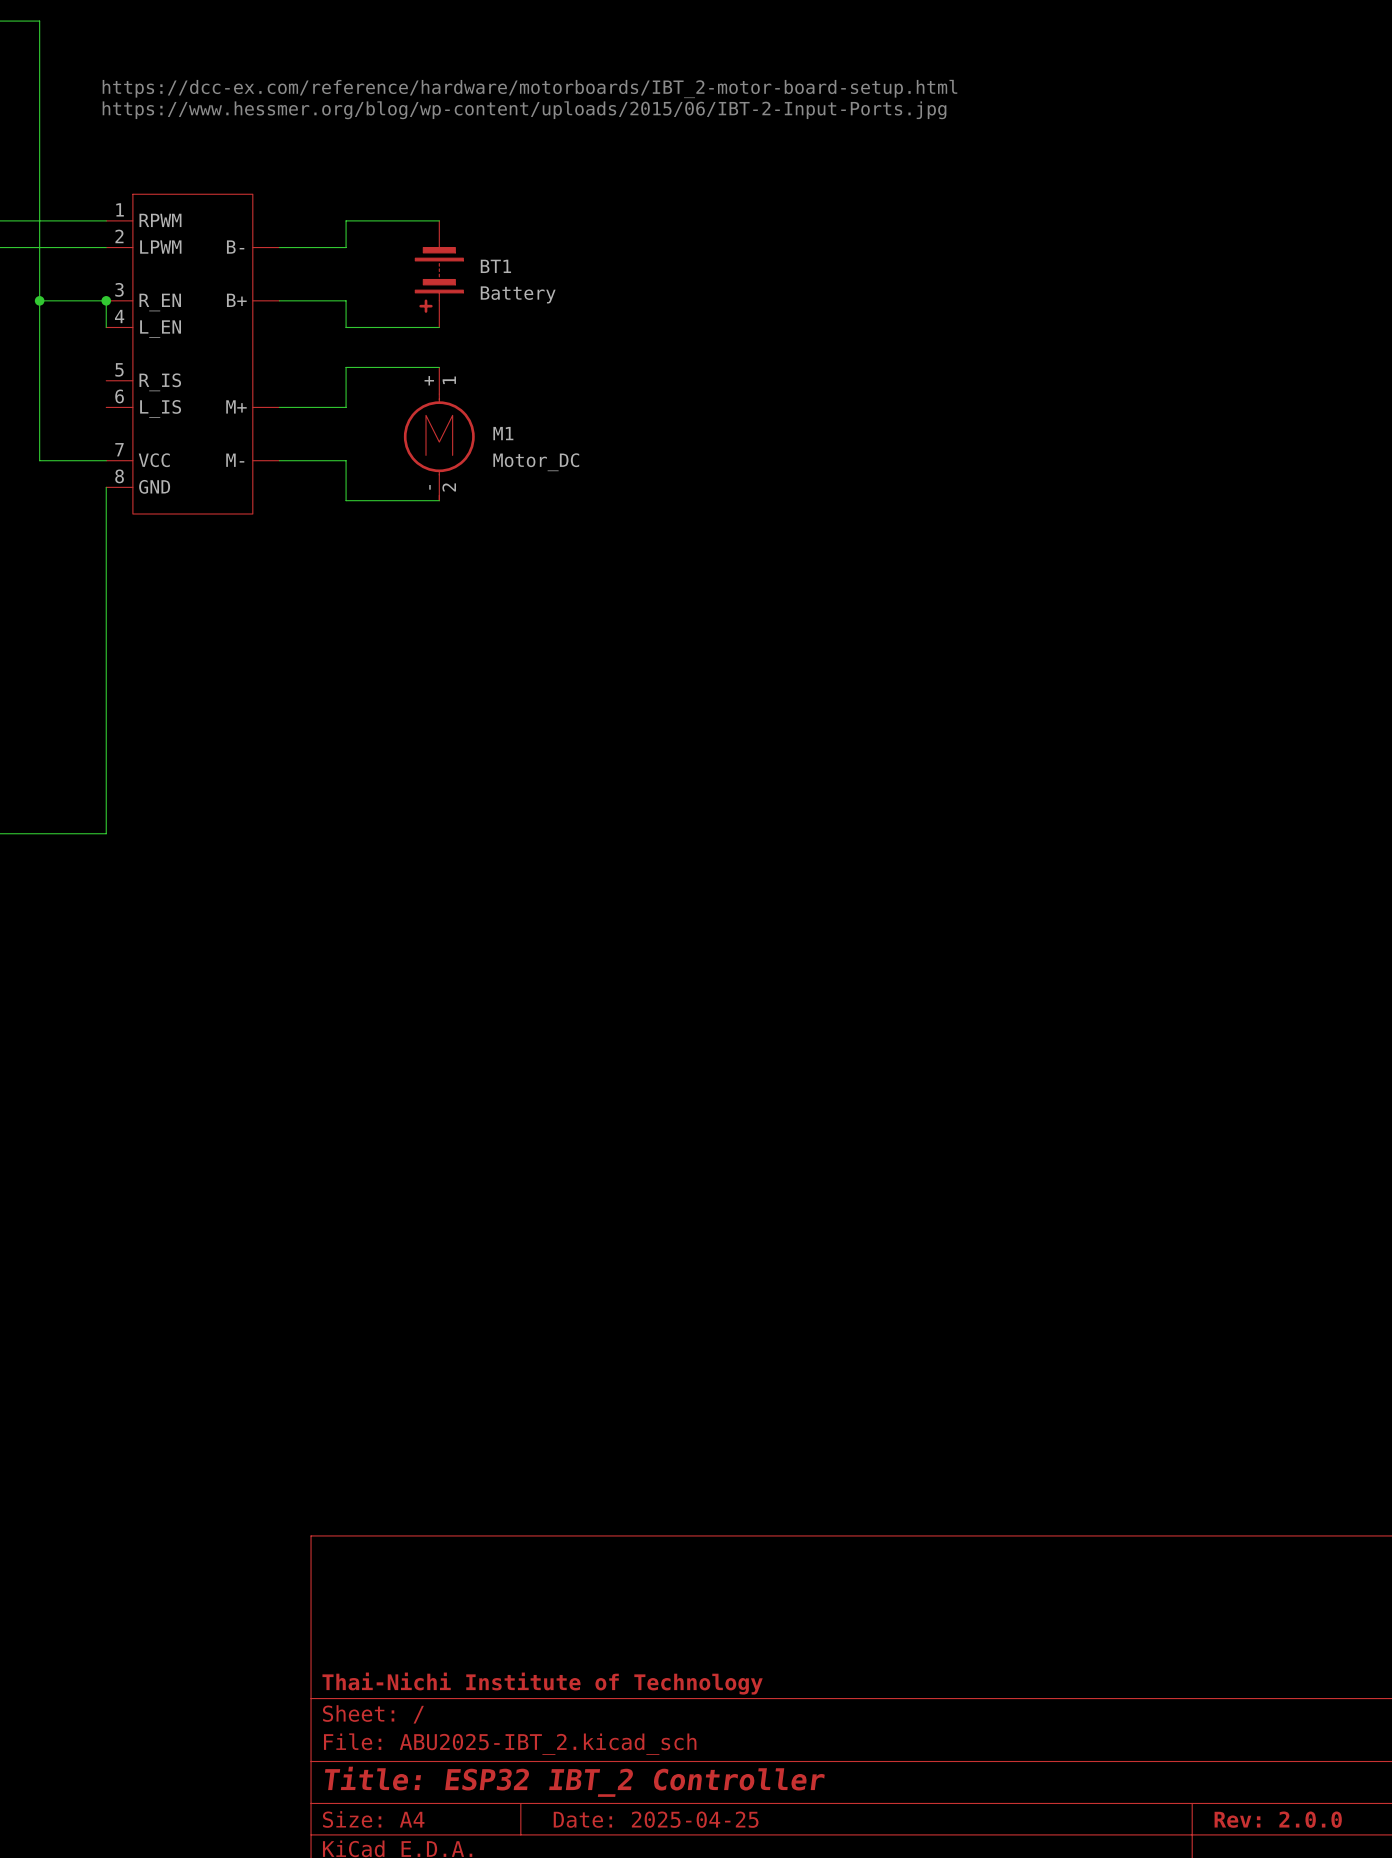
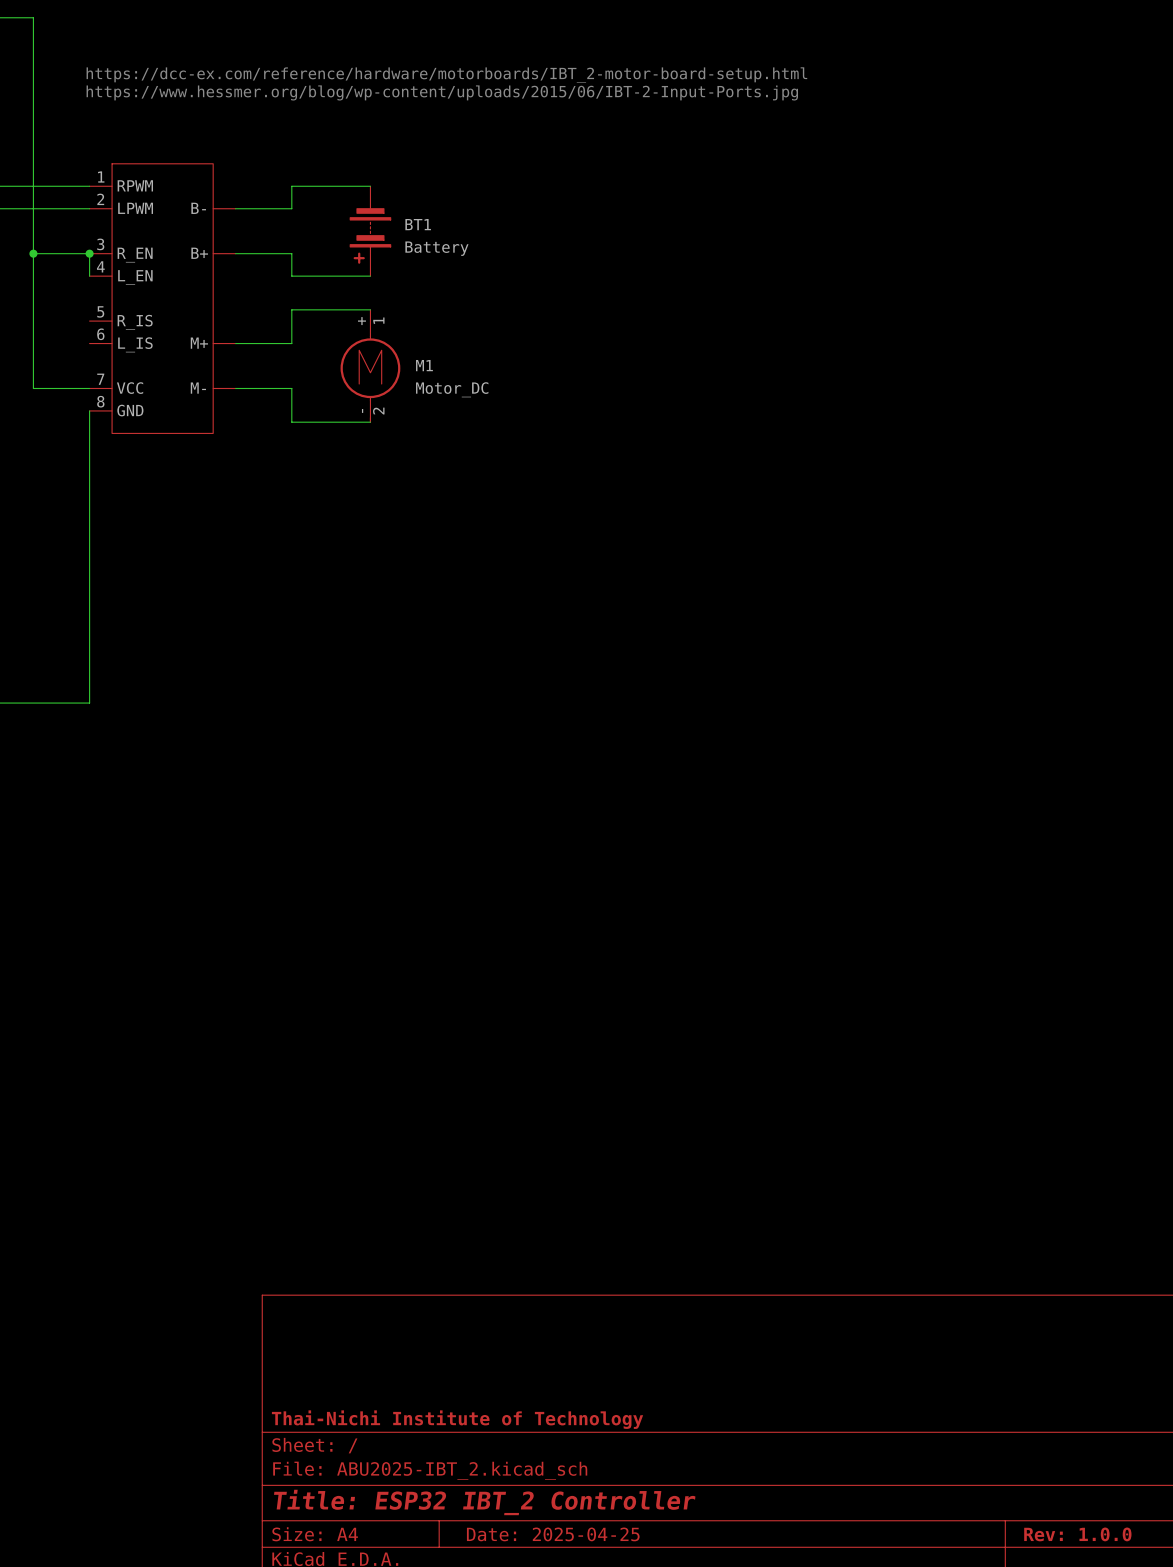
title block: Rev: 2.0.0 (1278, 1819) -> Rev: 1.0.0 (1077, 1534)

